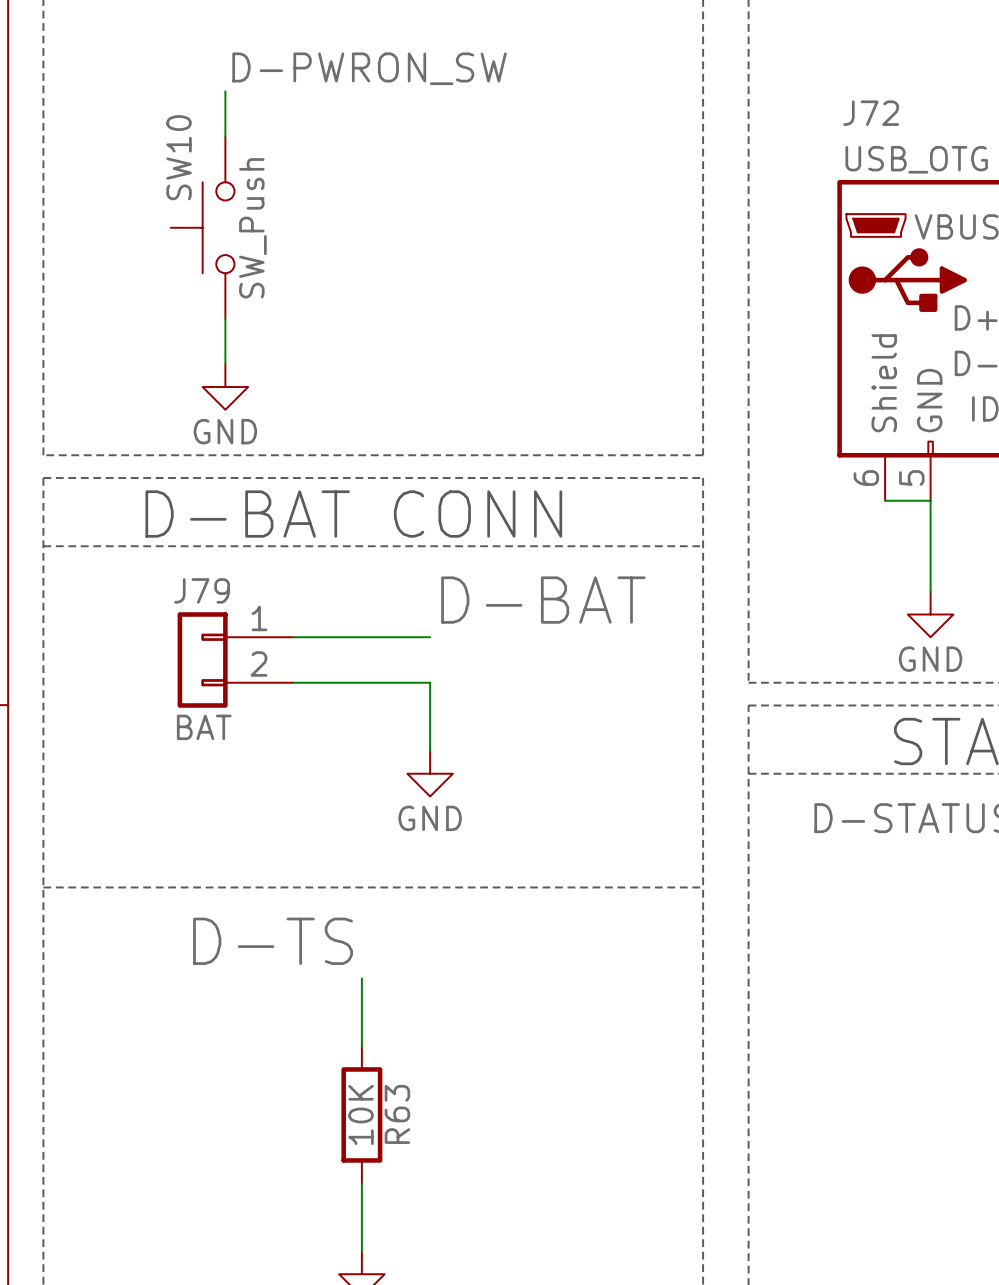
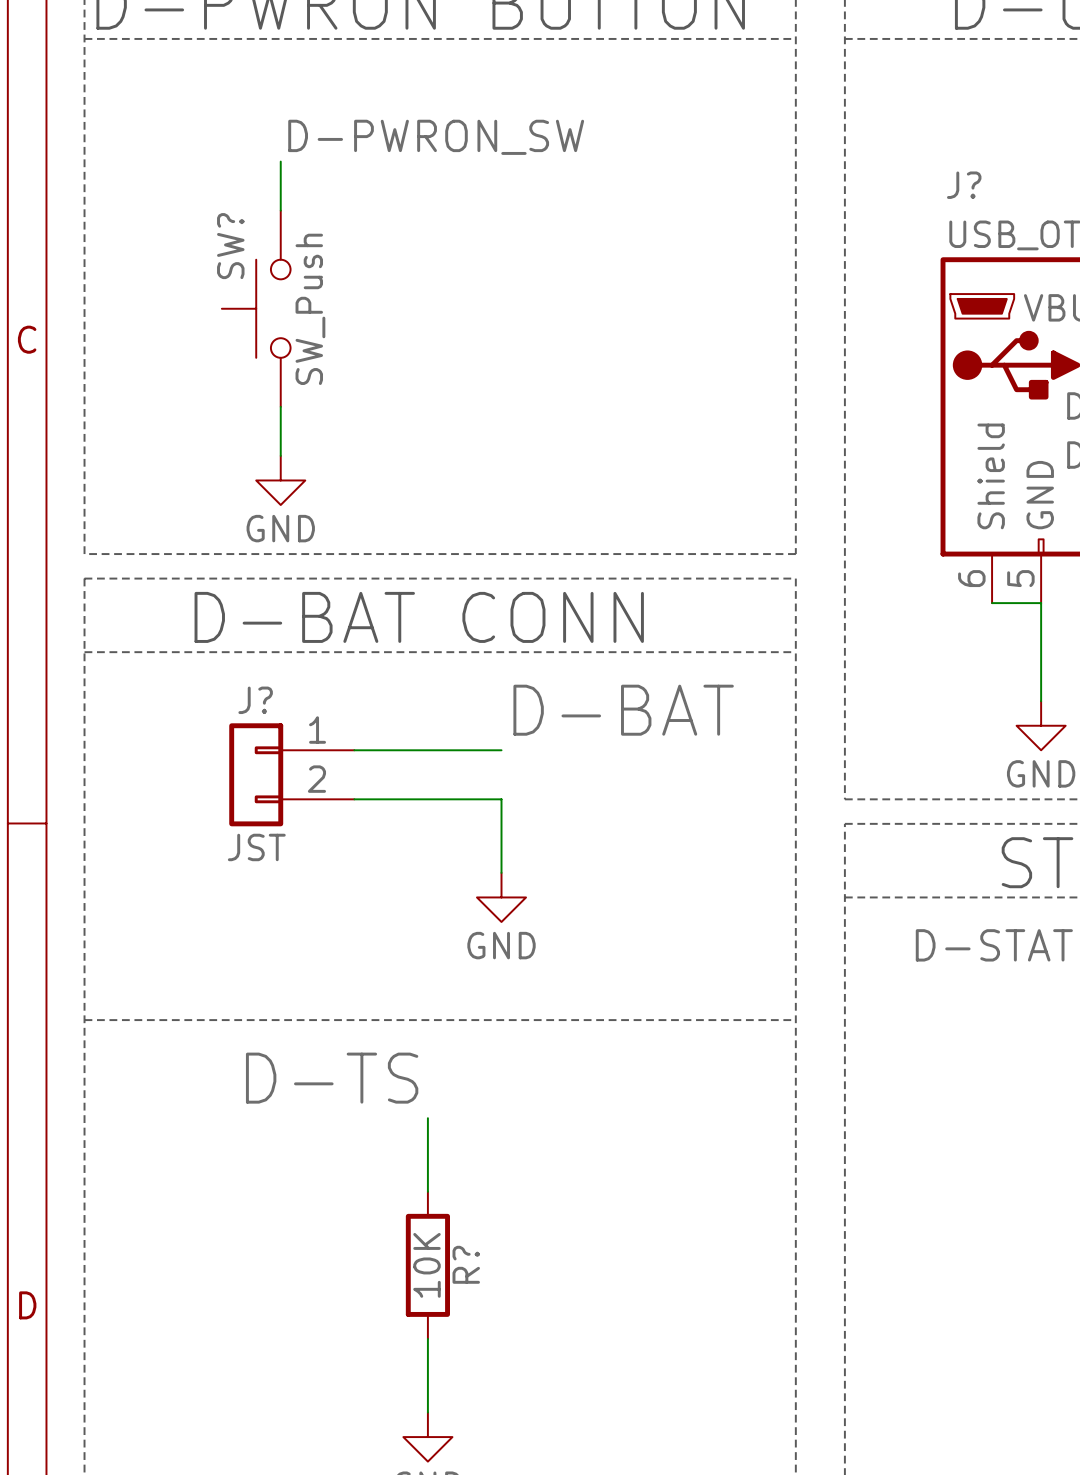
J72 name: J72 (871, 113) -> J? (964, 185)
SW10 name: SW10 (179, 157) -> SW? (230, 246)
J79 name: J79 (202, 590) -> J? (255, 700)
J79 value: BAT (204, 727) -> JST (256, 847)
R63 name: R63 (397, 1114) -> R? (466, 1264)

